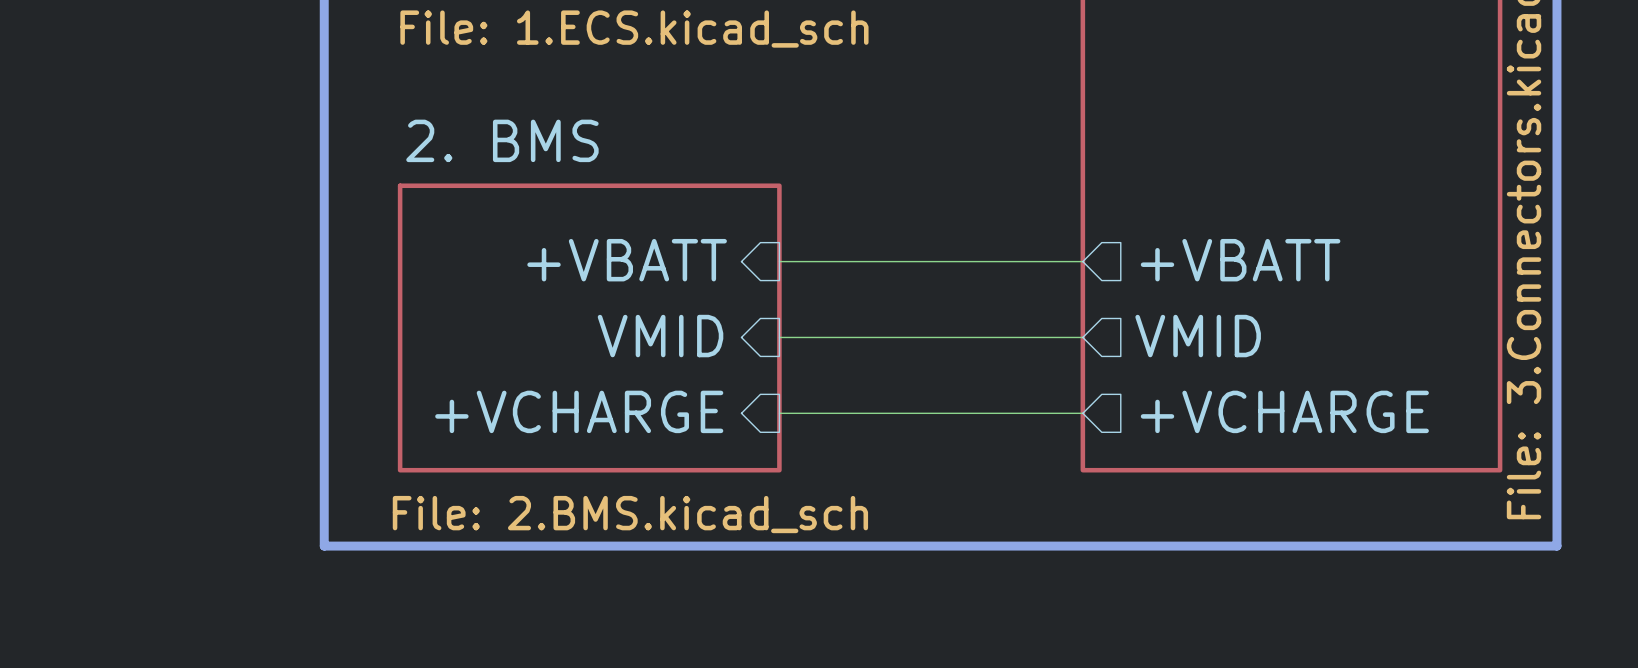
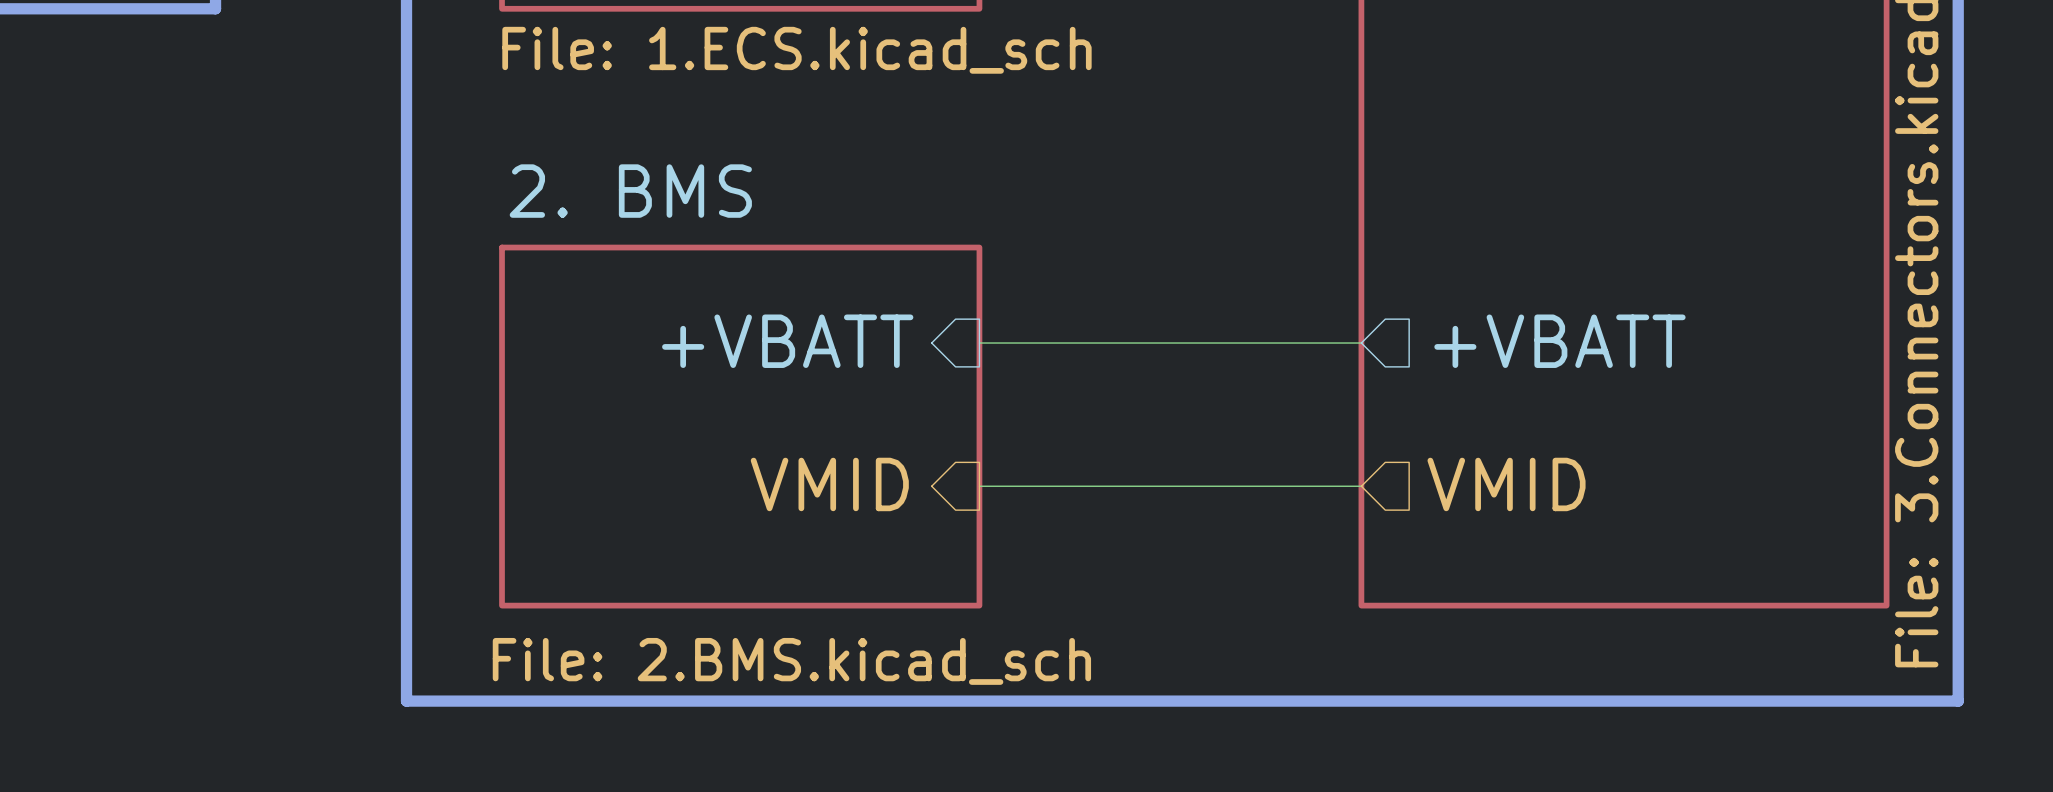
sheet pin: VMID (660, 336) -> none
sheet pin: VMID (1198, 336) -> none
wire: (779, 337) (1082, 337) -> (979, 486) (1361, 486)
hierarchical label: none -> VMID (829, 484)
hierarchical label: none -> VMID (1506, 484)
sheet pin: +VCHARGE (579, 411) -> none
sheet pin: +VCHARGE (1284, 411) -> none
wire: (779, 413) (1082, 413) -> none

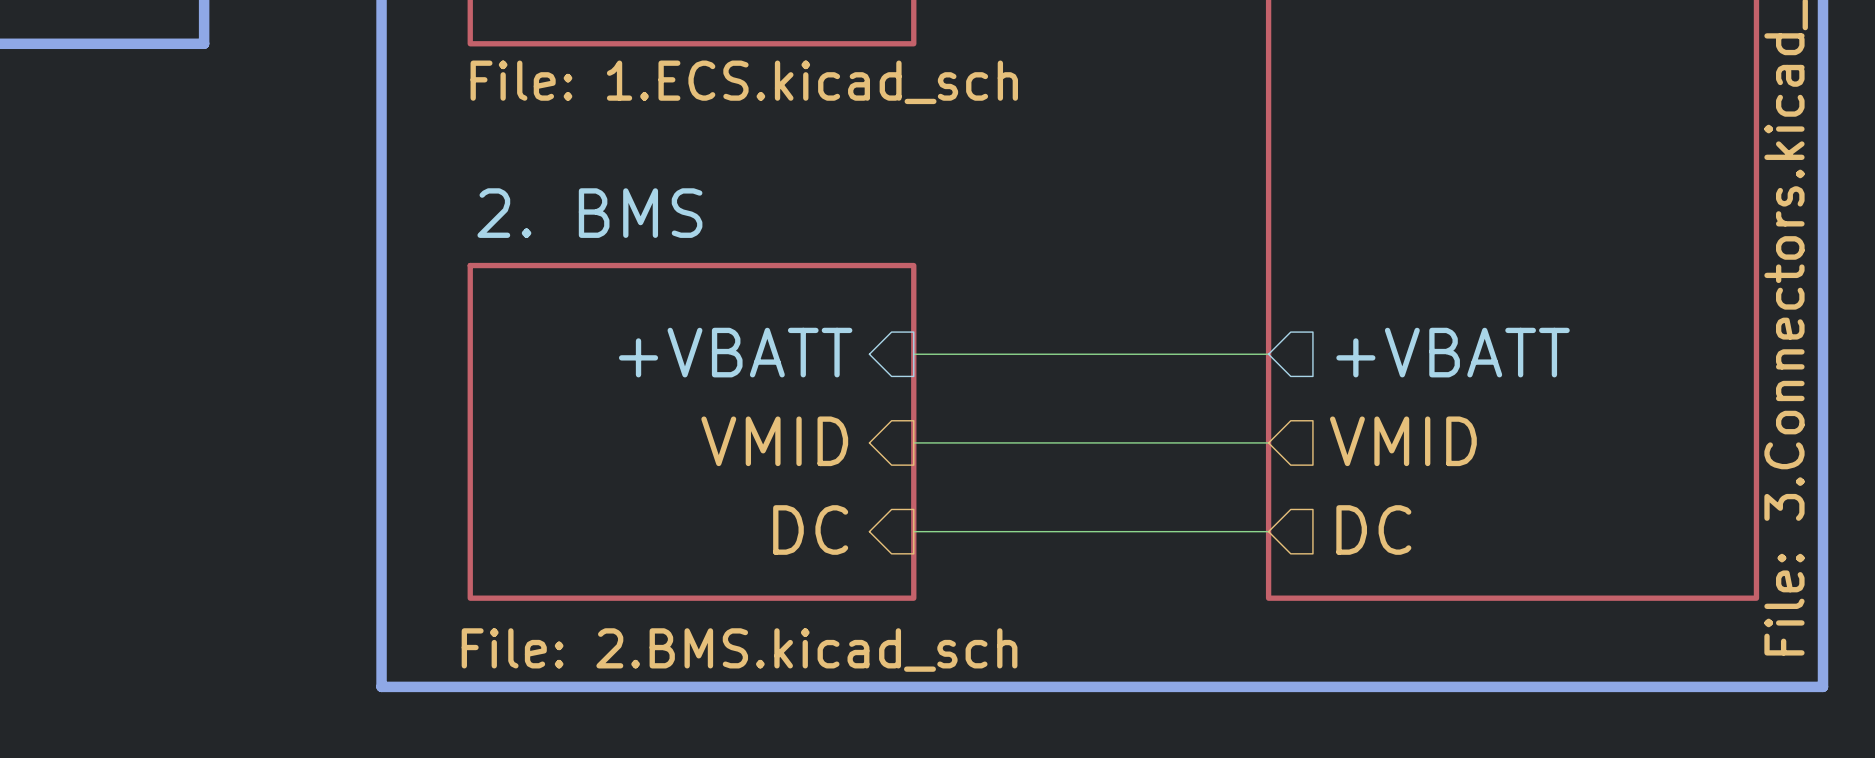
hierarchical label position: VMID (829, 484) -> VMID (774, 441)
hierarchical label position: VMID (1506, 484) -> VMID (1403, 441)
wire: (979, 486) (1361, 486) -> (913, 442) (1268, 442)
hierarchical label: none -> DC (810, 529)
hierarchical label: none -> DC (1373, 529)
wire: none -> (913, 531) (1268, 531)

